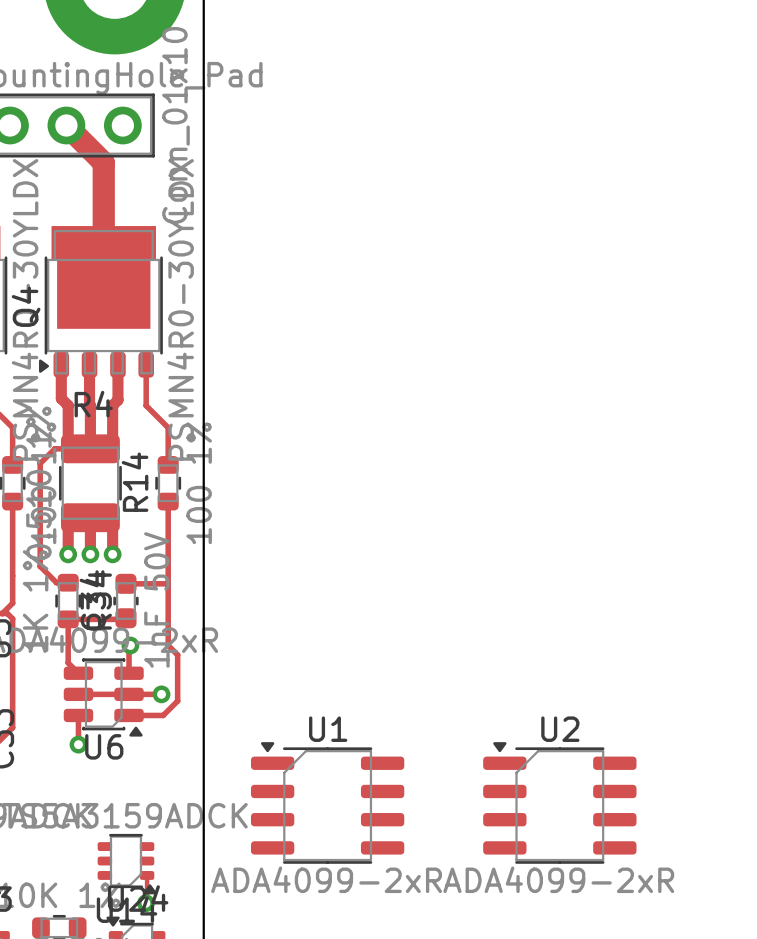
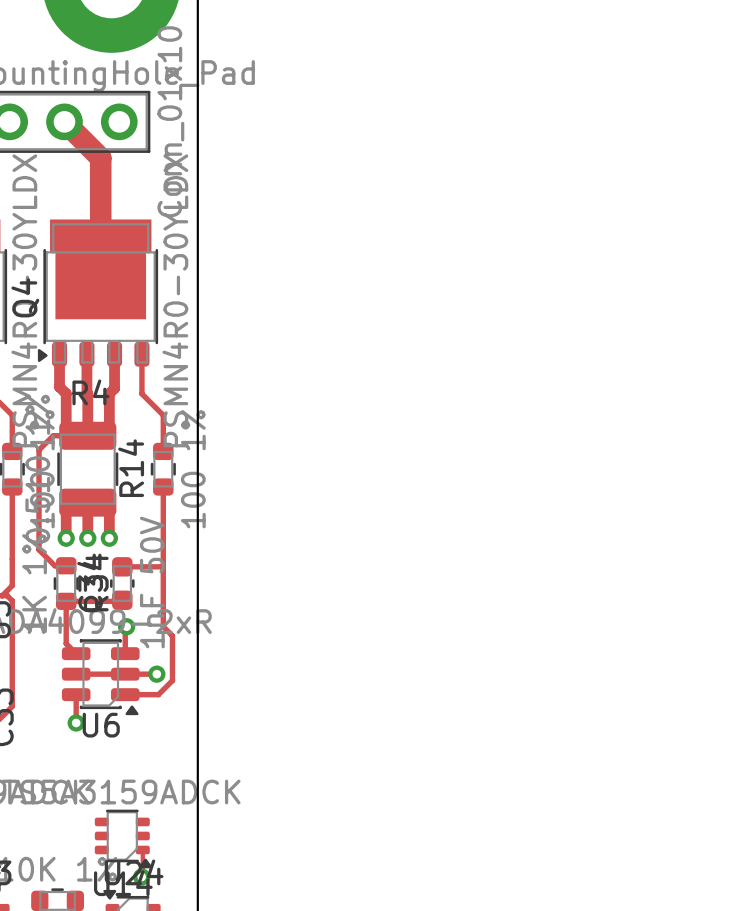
U1: ADA4099-2xR (327, 802) -> none
U2: ADA4099-2xR (559, 802) -> none

